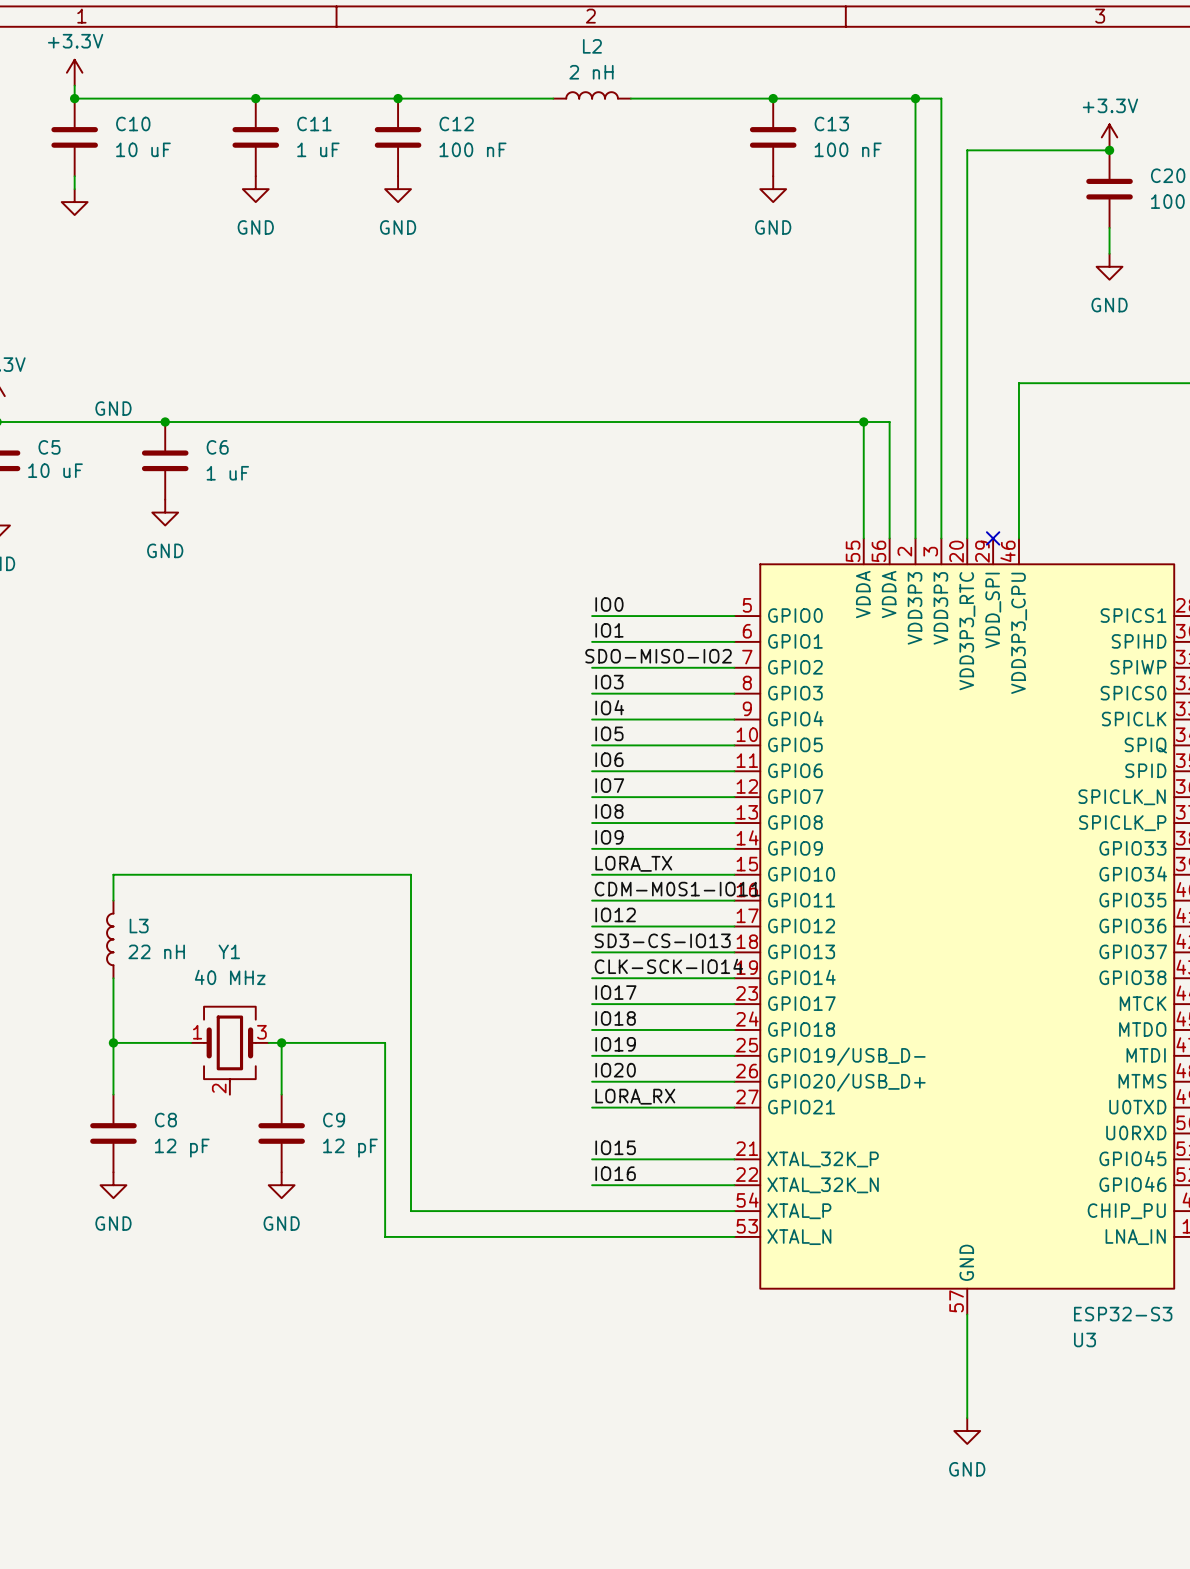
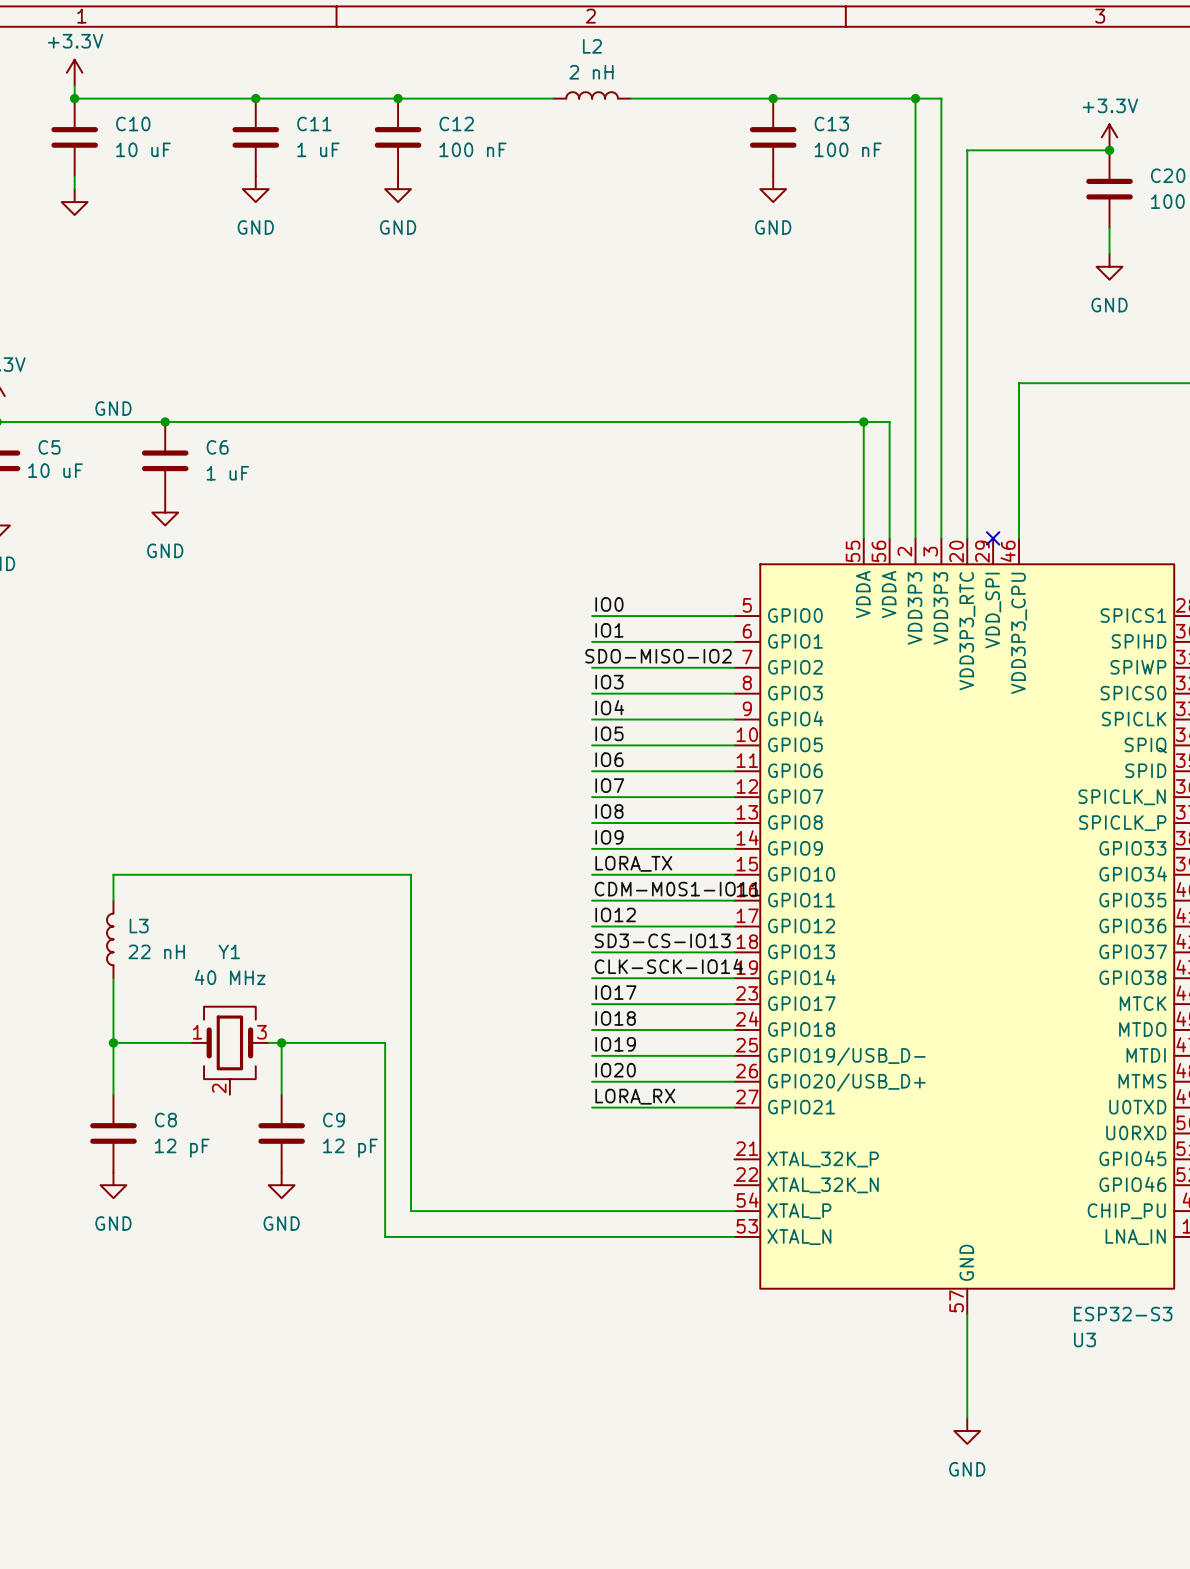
label: IO15 (615, 1147) -> none
wire: (592, 1159) (734, 1159) -> none
label: IO16 (615, 1173) -> none
wire: (592, 1185) (734, 1185) -> none

